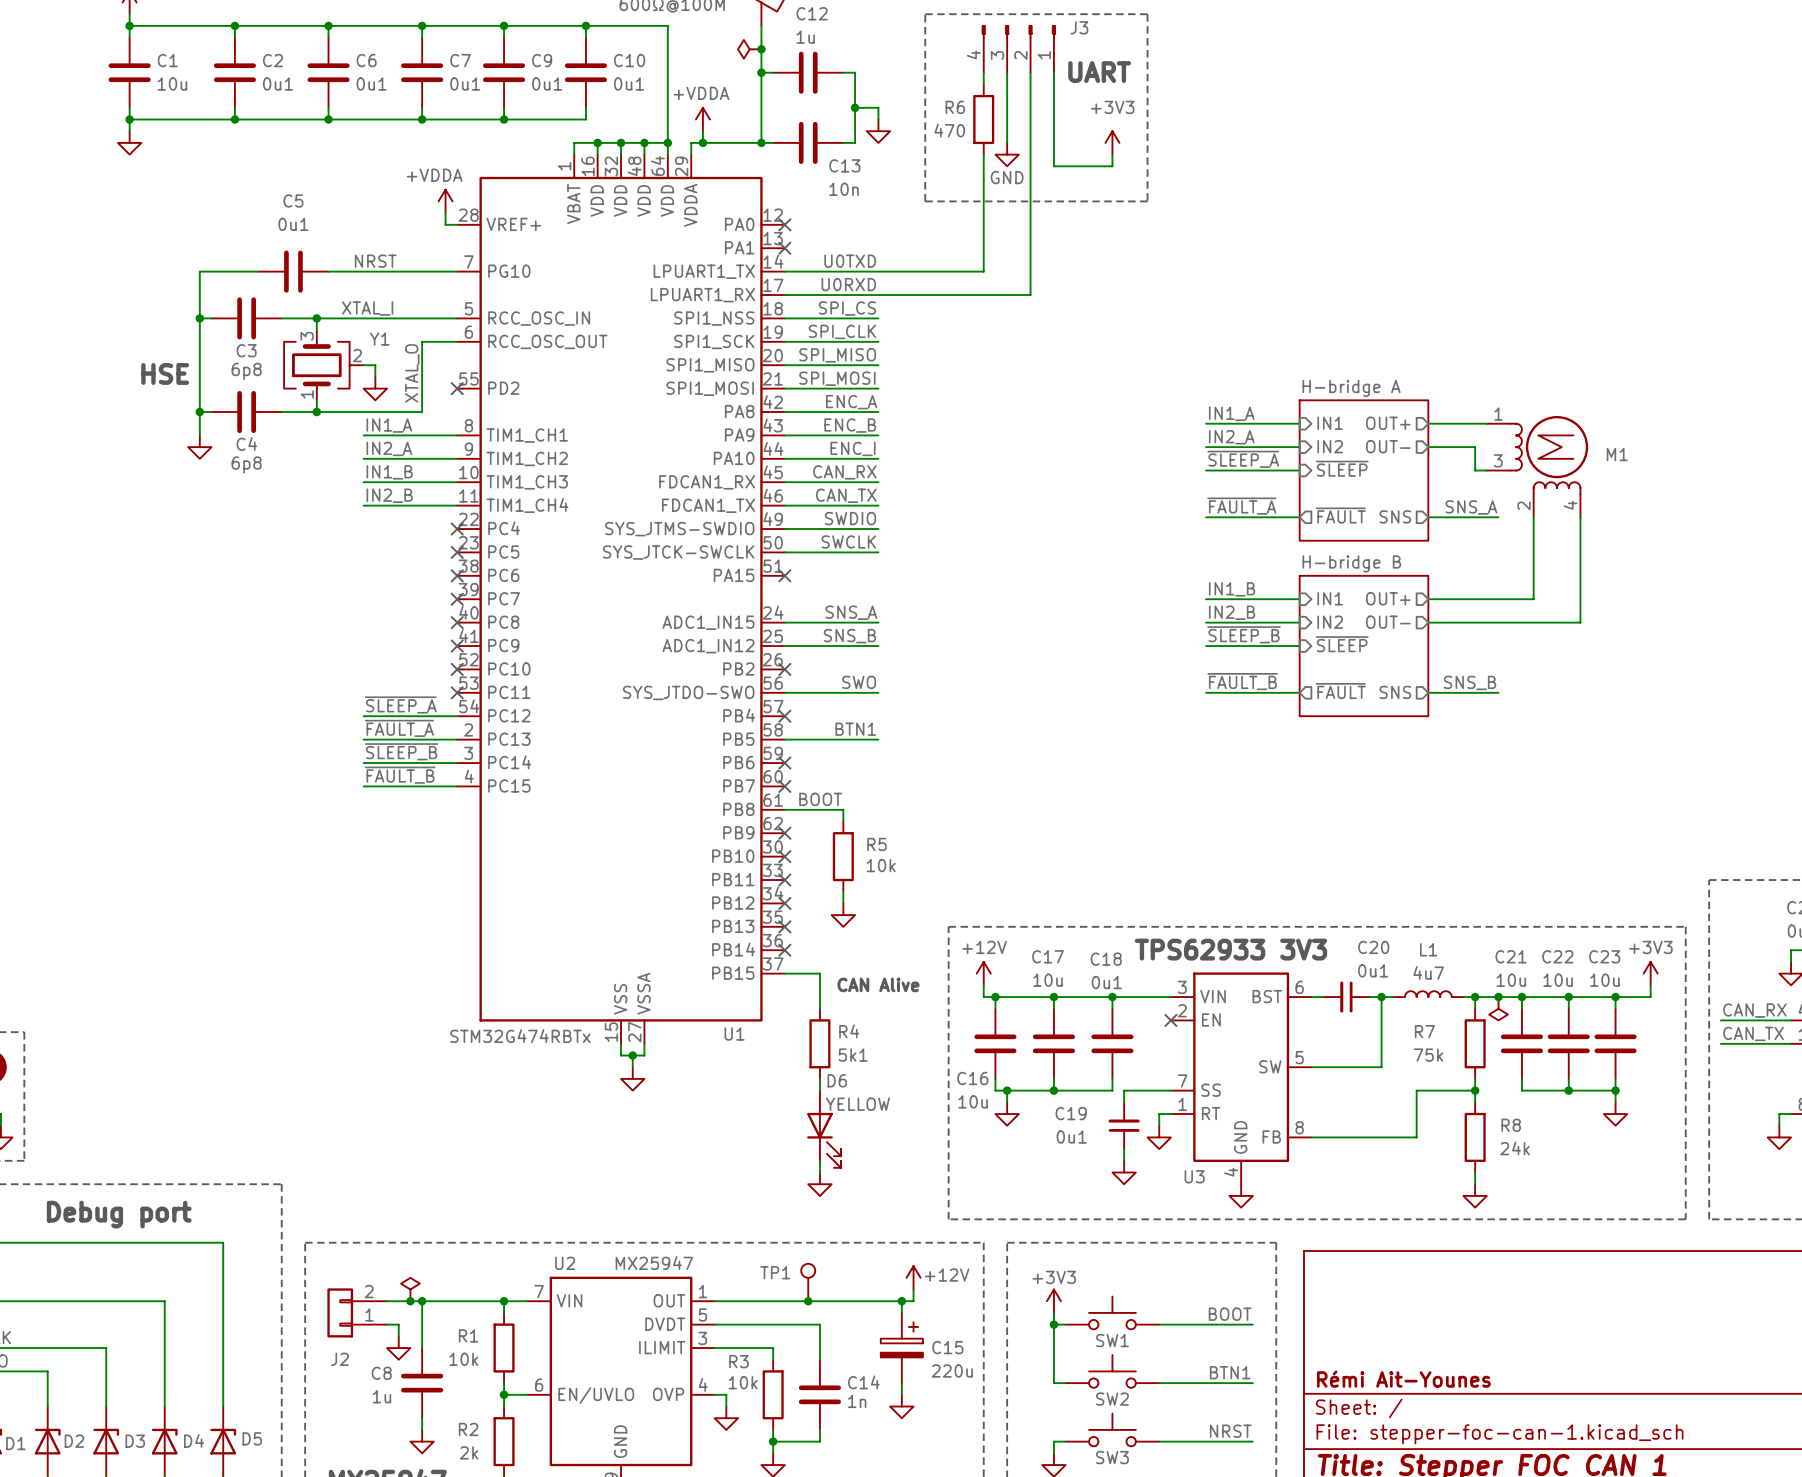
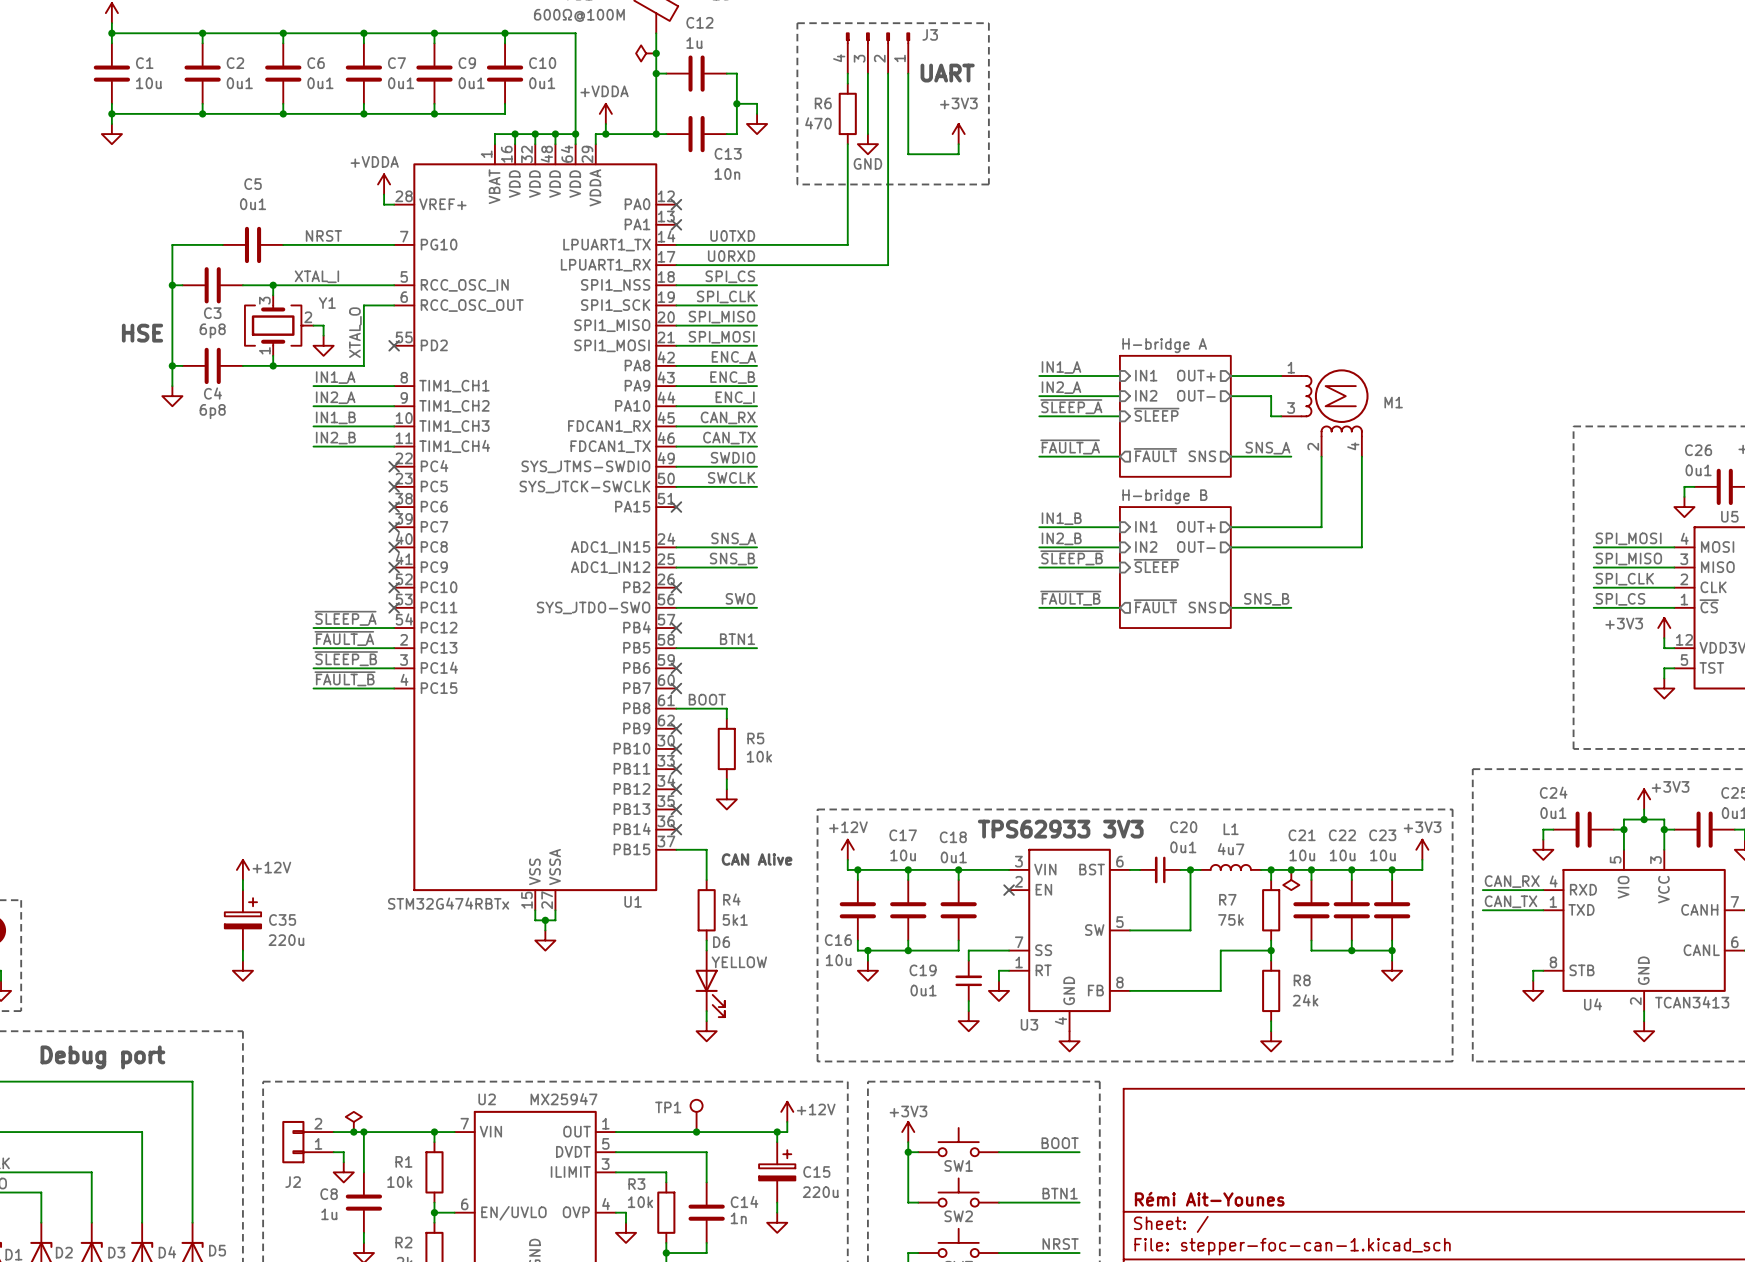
power symbol: none -> +12V (242, 869)
wire: none -> (242, 880) (242, 890)
C35: none -> 220u (242, 920)
wire: none -> (242, 950) (242, 960)
power symbol: none -> (242, 970)

